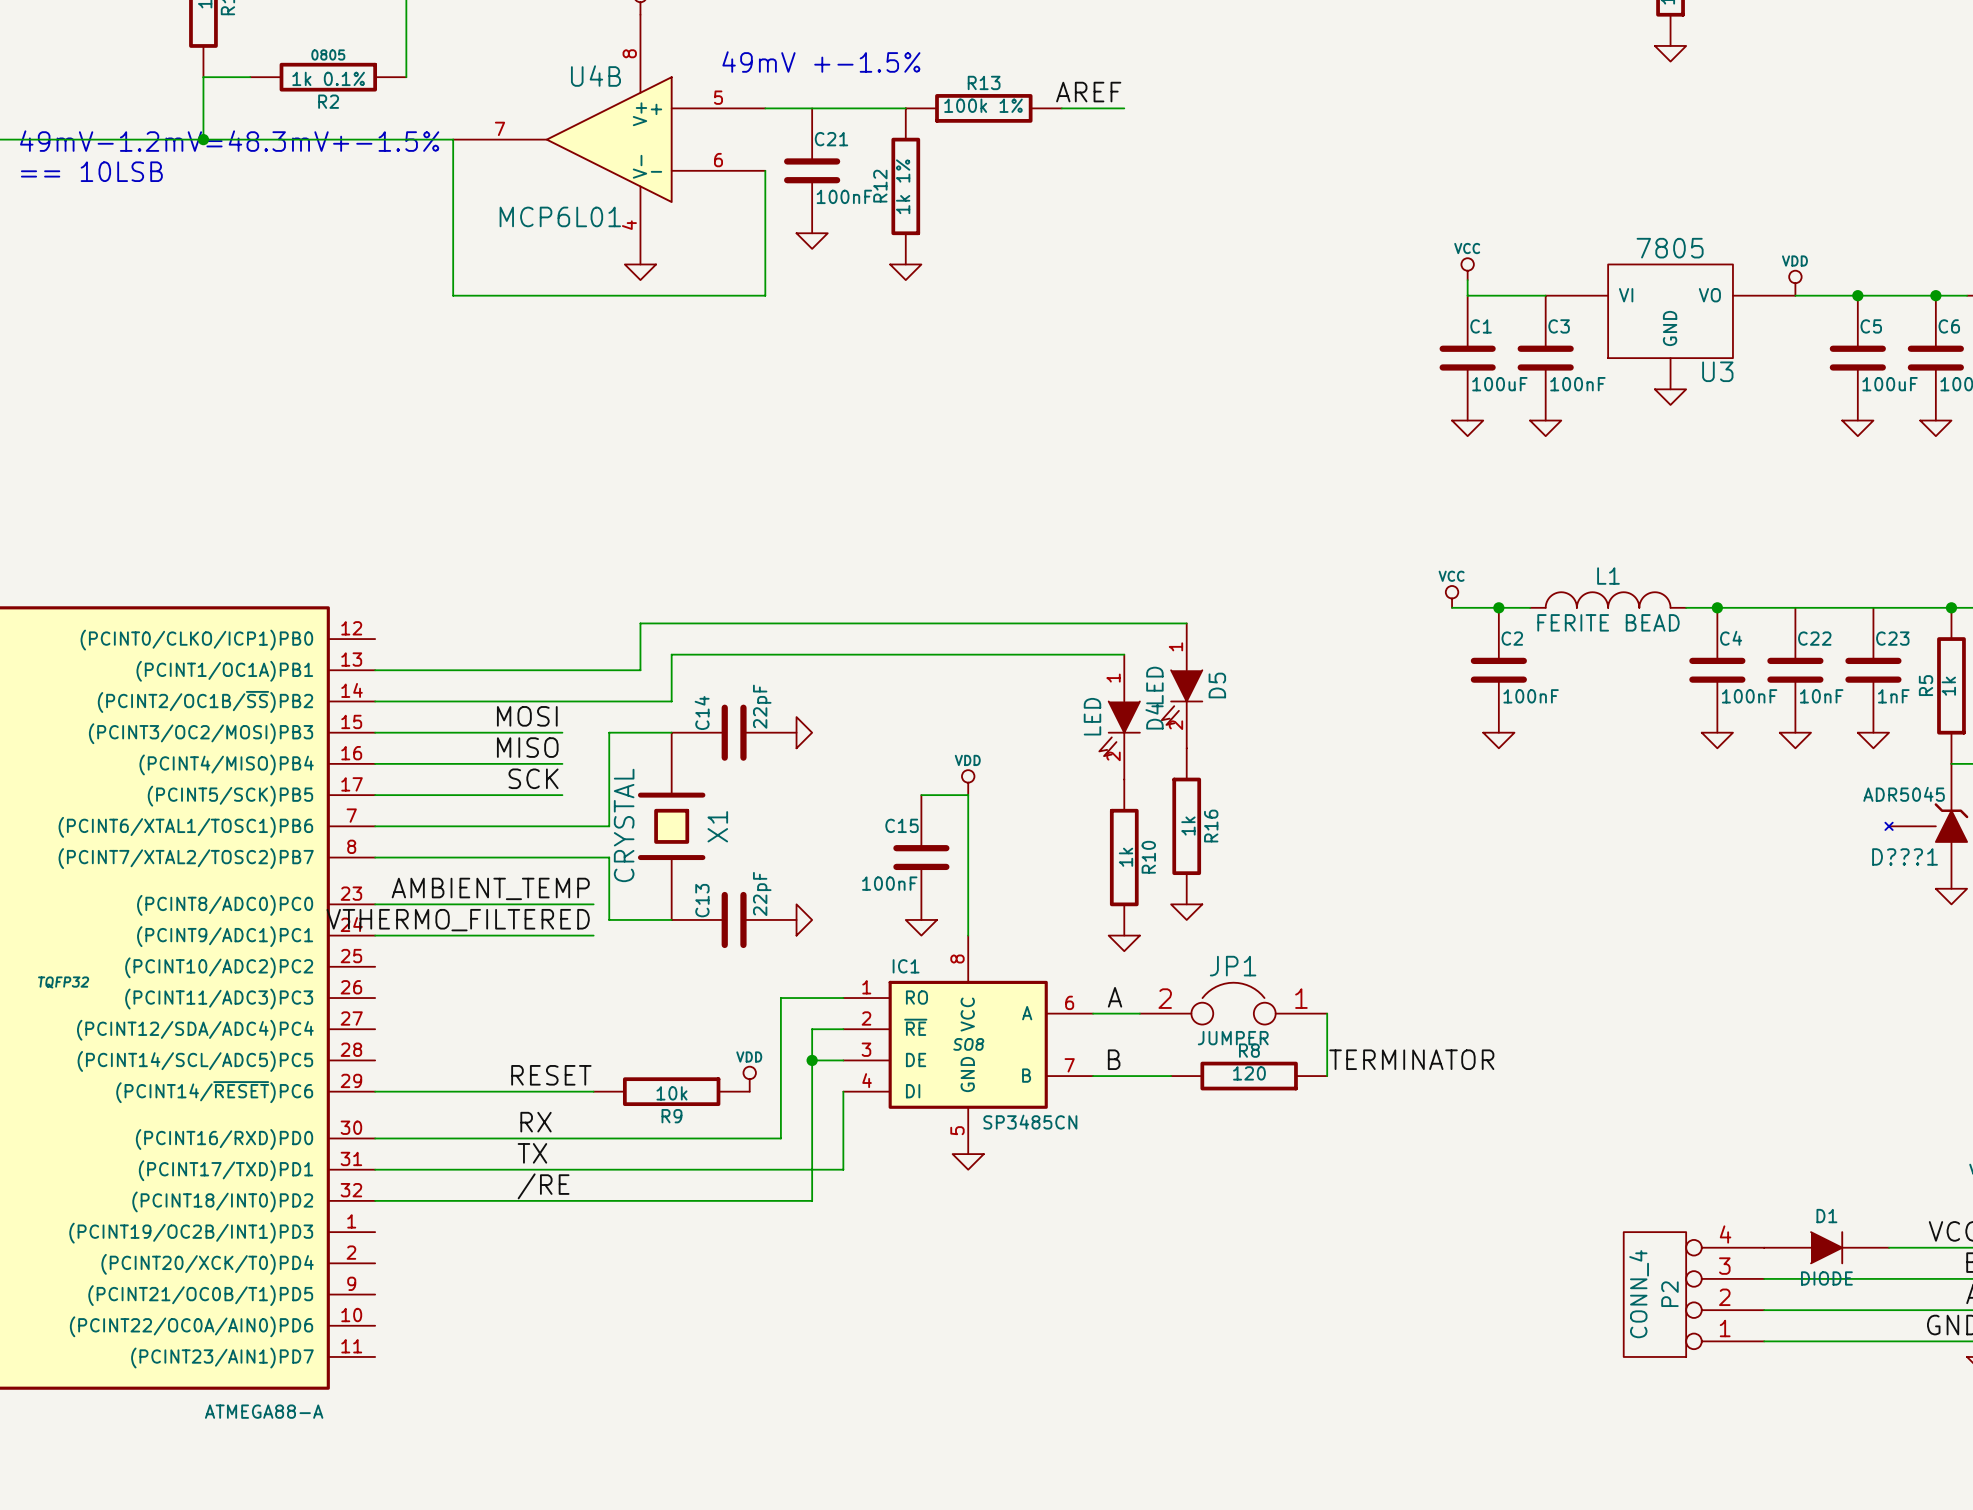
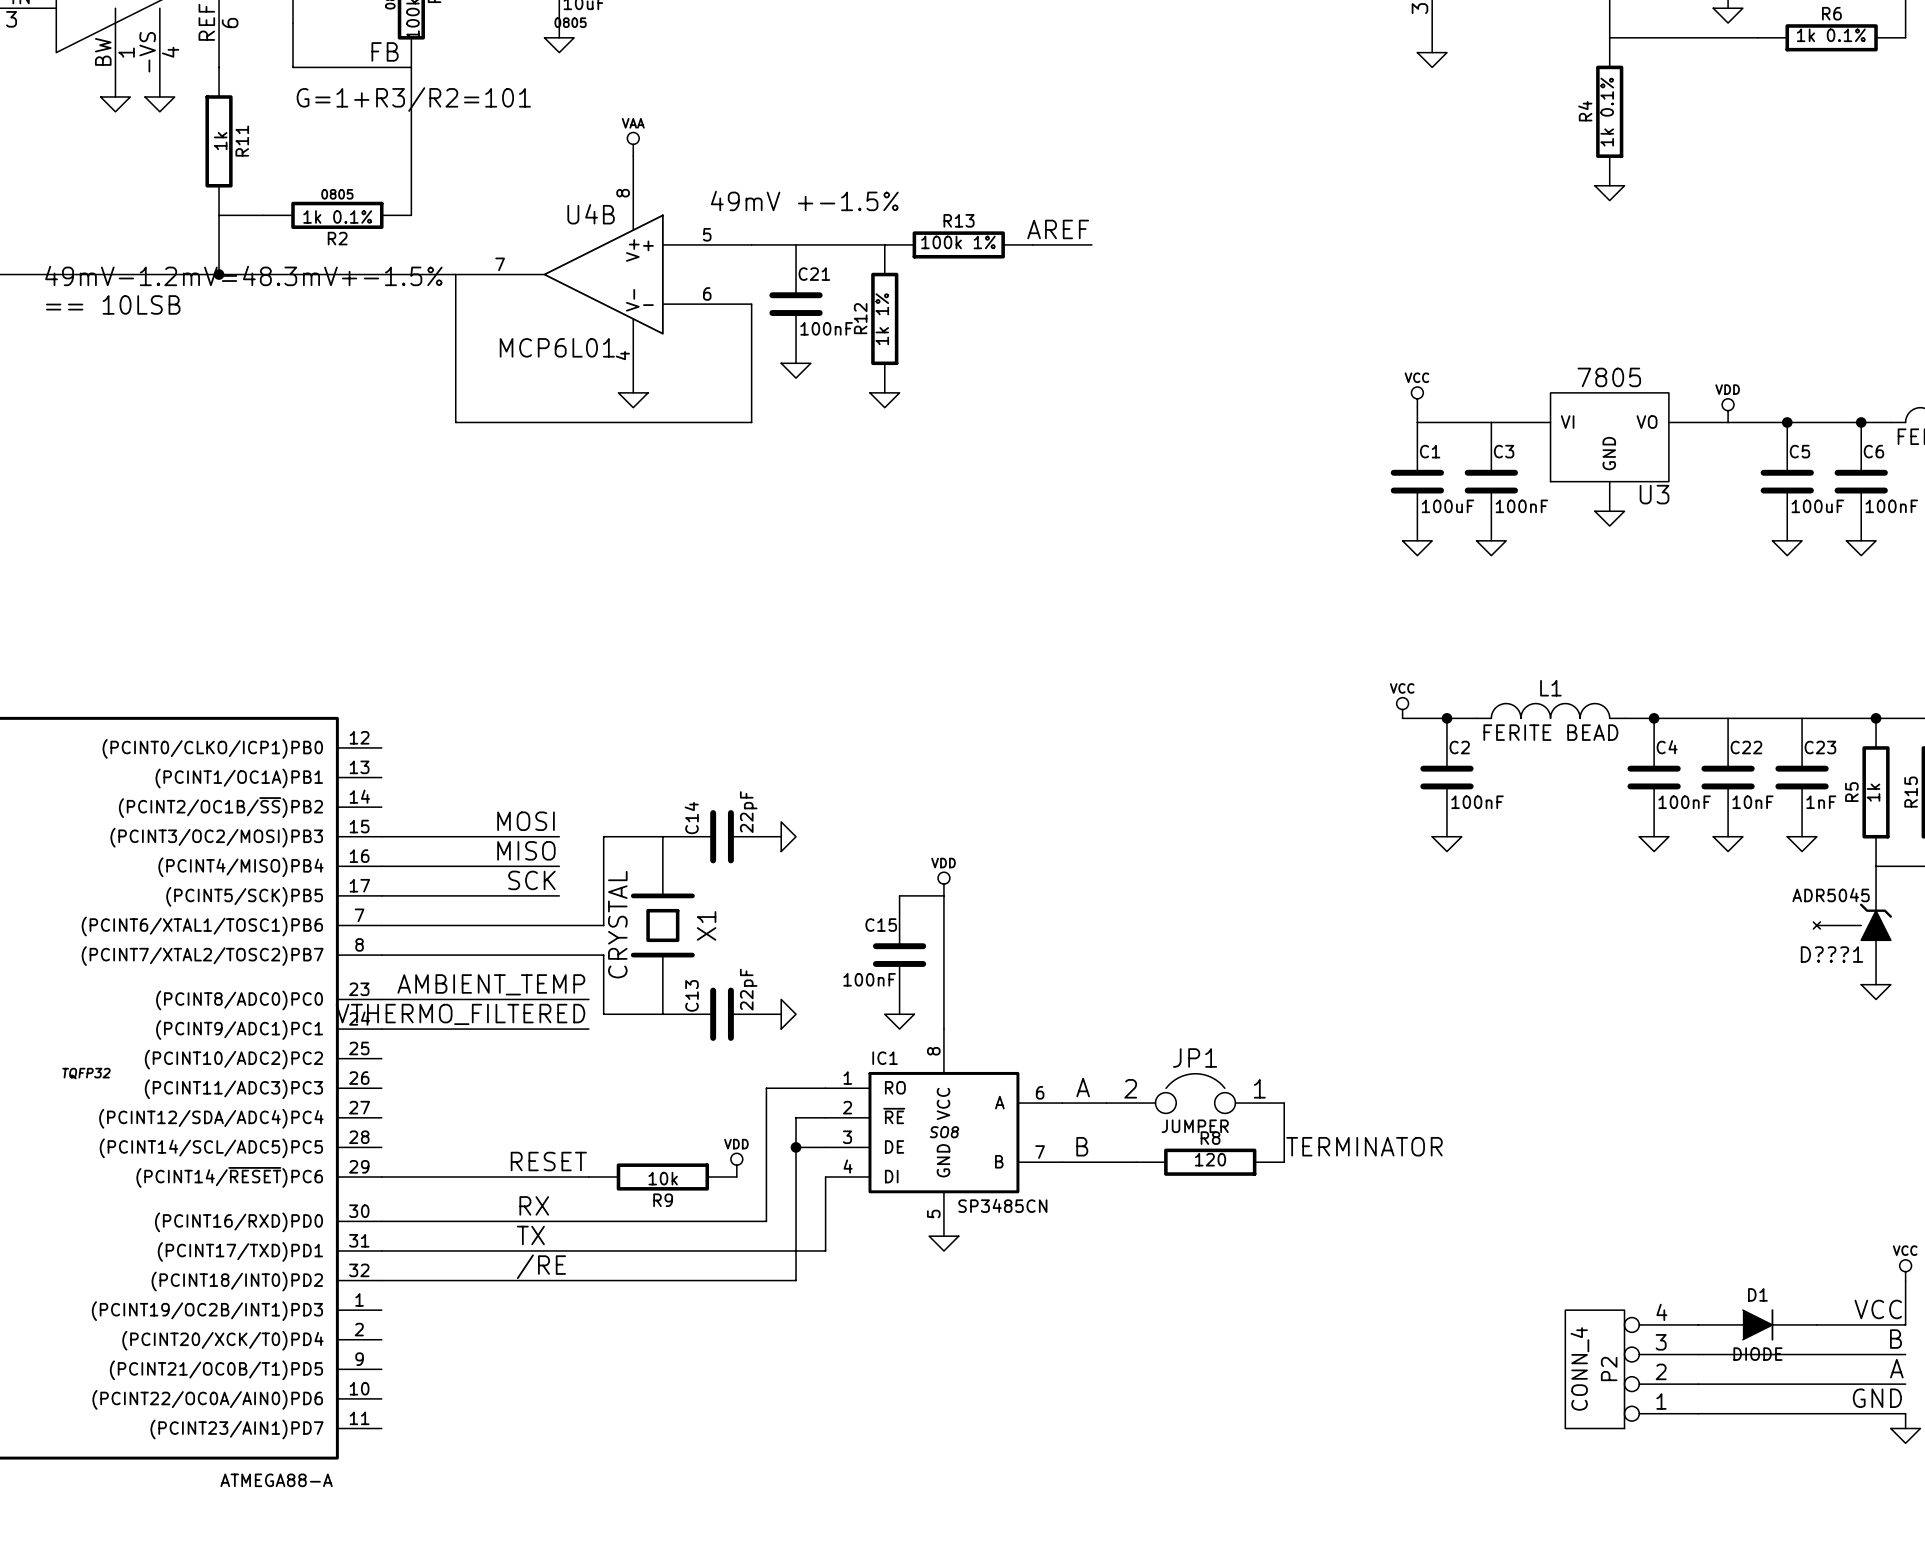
wire: (1186, 623) (640, 623) (640, 670) (375, 670) -> none
wire: (1124, 654) (671, 654) (671, 701) (375, 701) -> none
D5: LED (1182, 685) -> none
D4: LED (1119, 717) -> none
R16: 1k (1186, 826) -> none
R10: 1k (1124, 857) -> none
power symbol: (1186, 912) -> none
power symbol: (1124, 943) -> none

